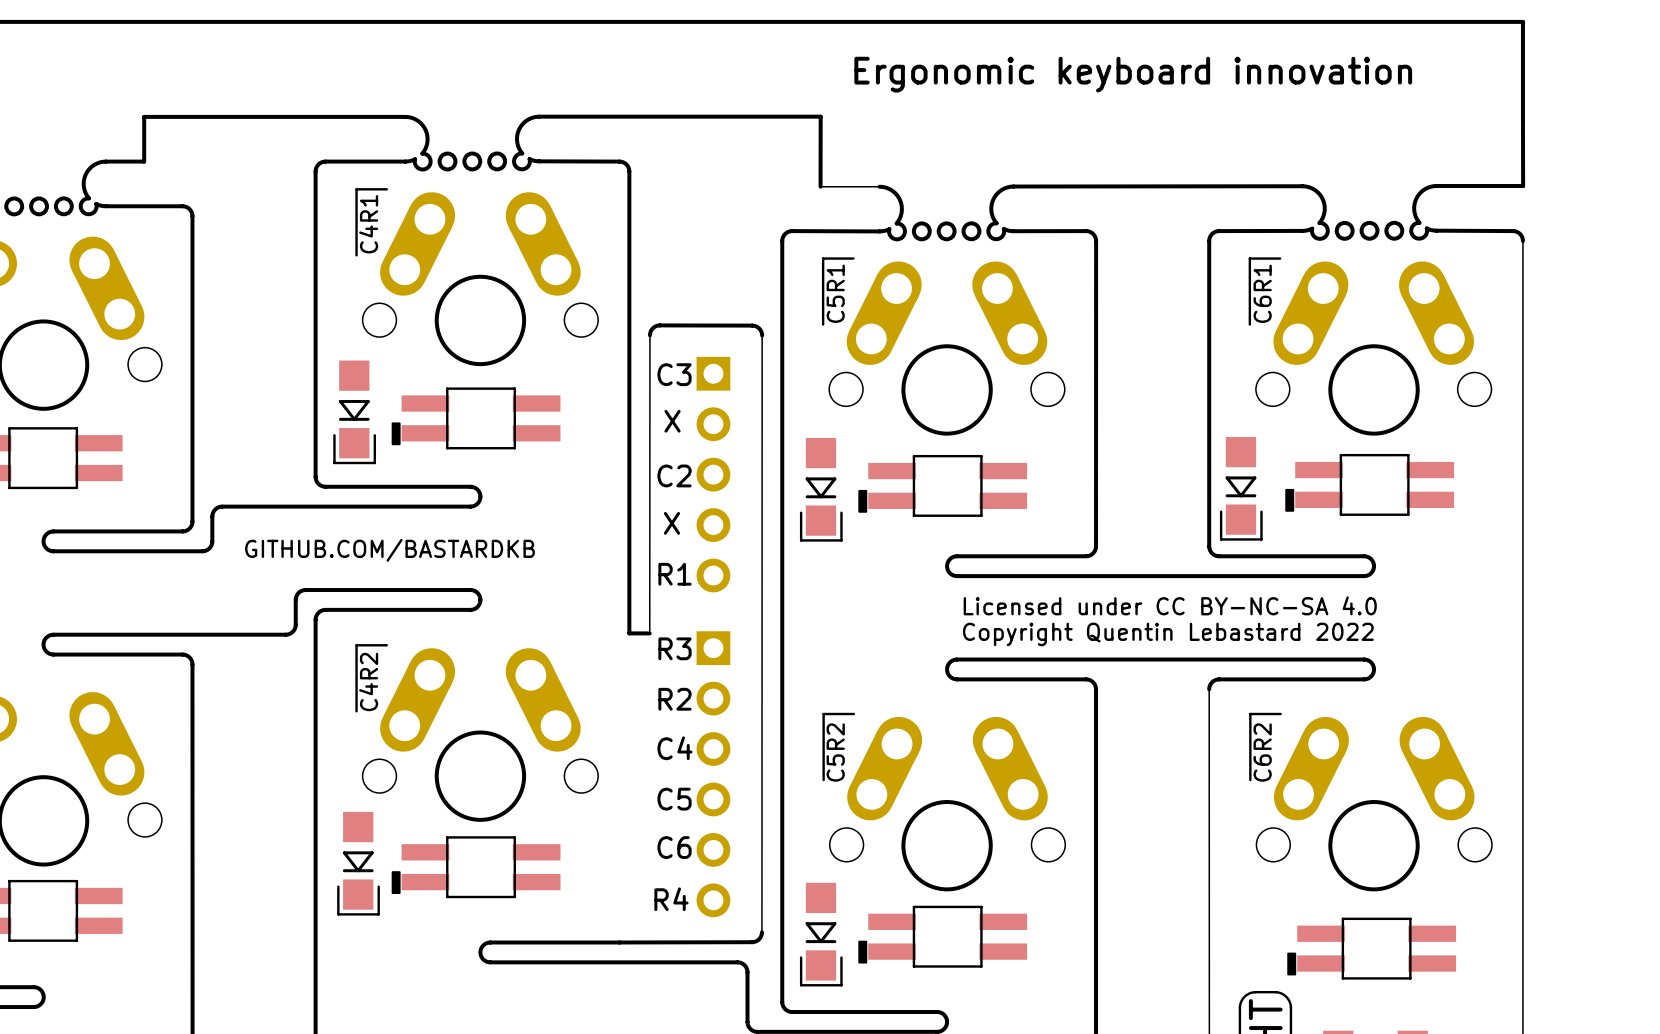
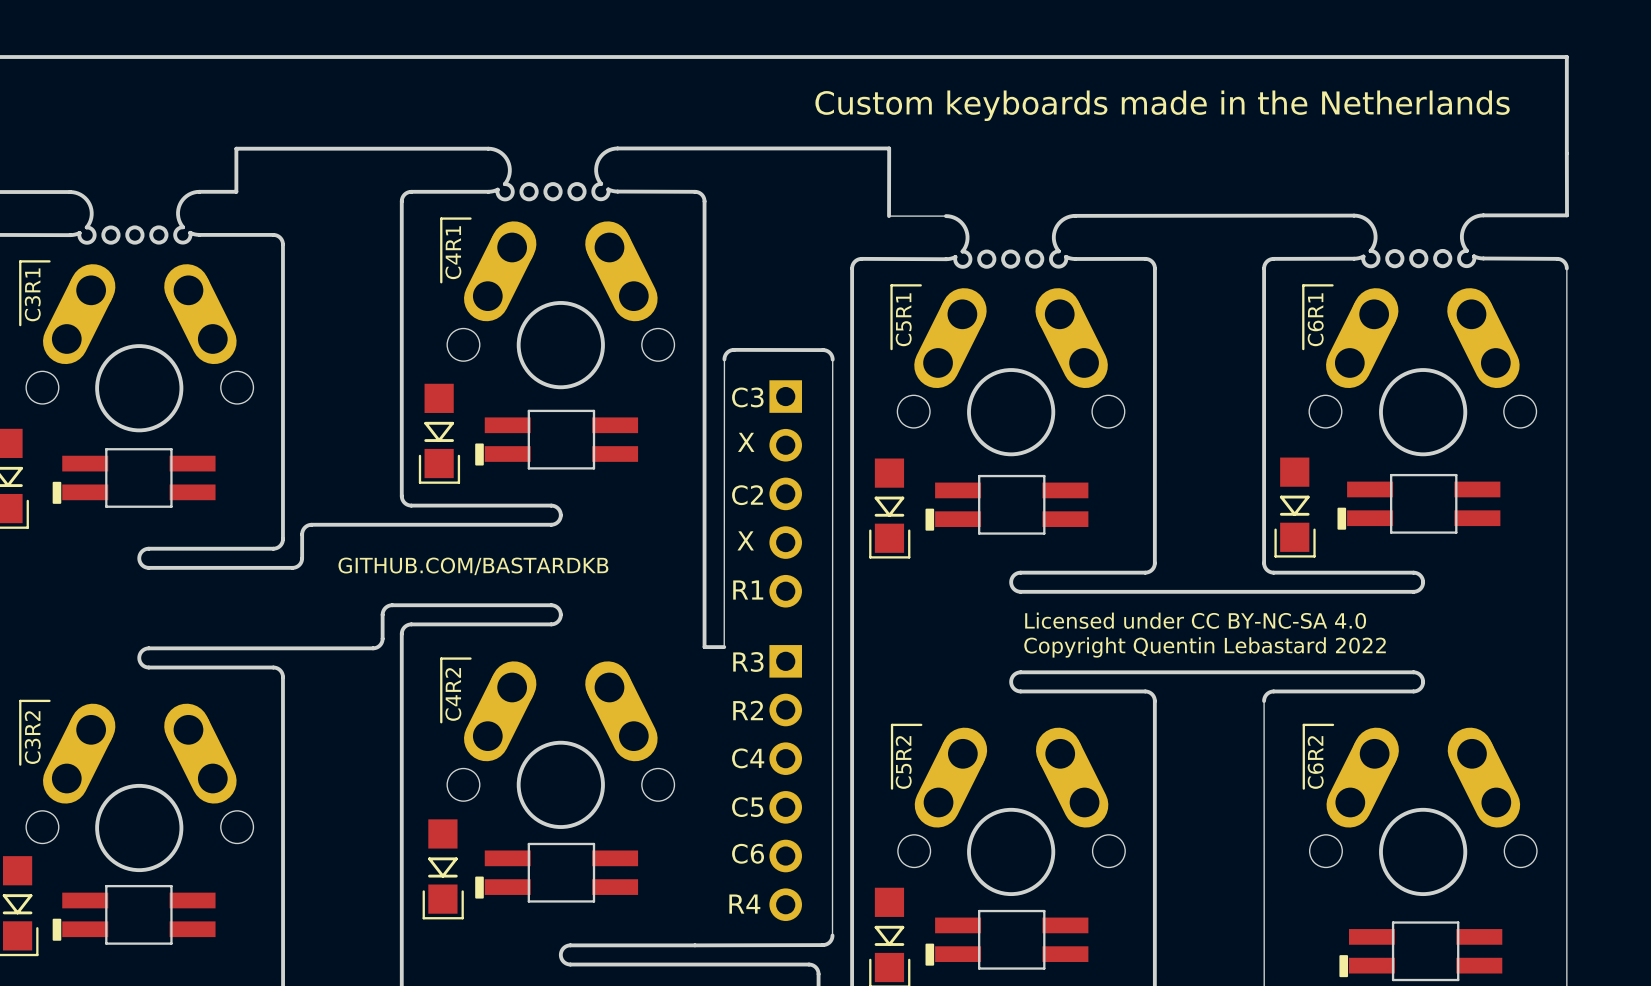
text: none -> Custom keyboards made in the Netherlands (1162, 105)
text: Ergonomic keyboard innovation (1133, 74) -> none

